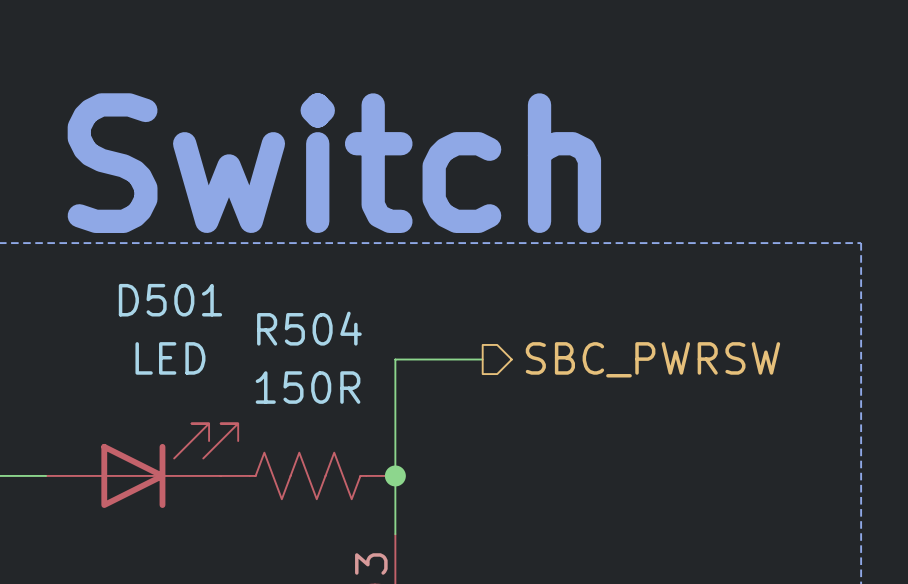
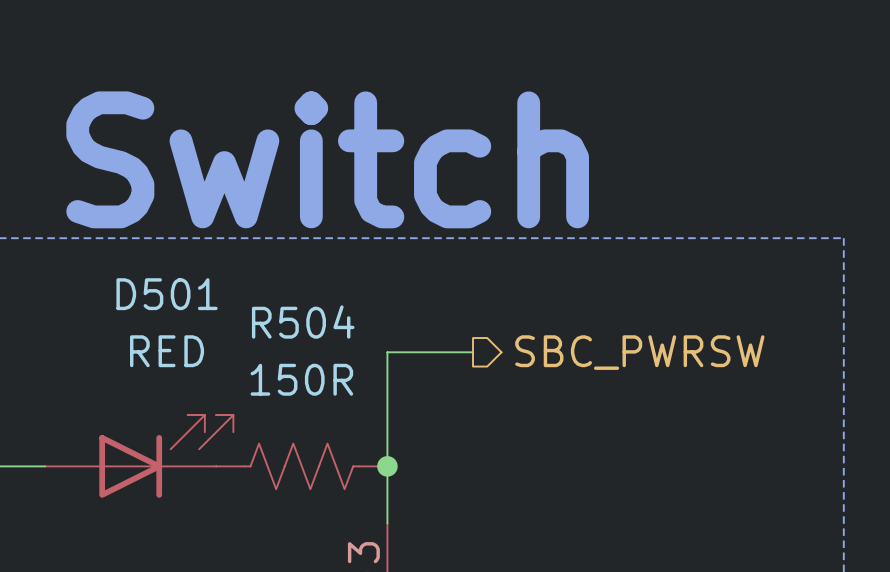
D501 value: LED (170, 358) -> RED (167, 351)

